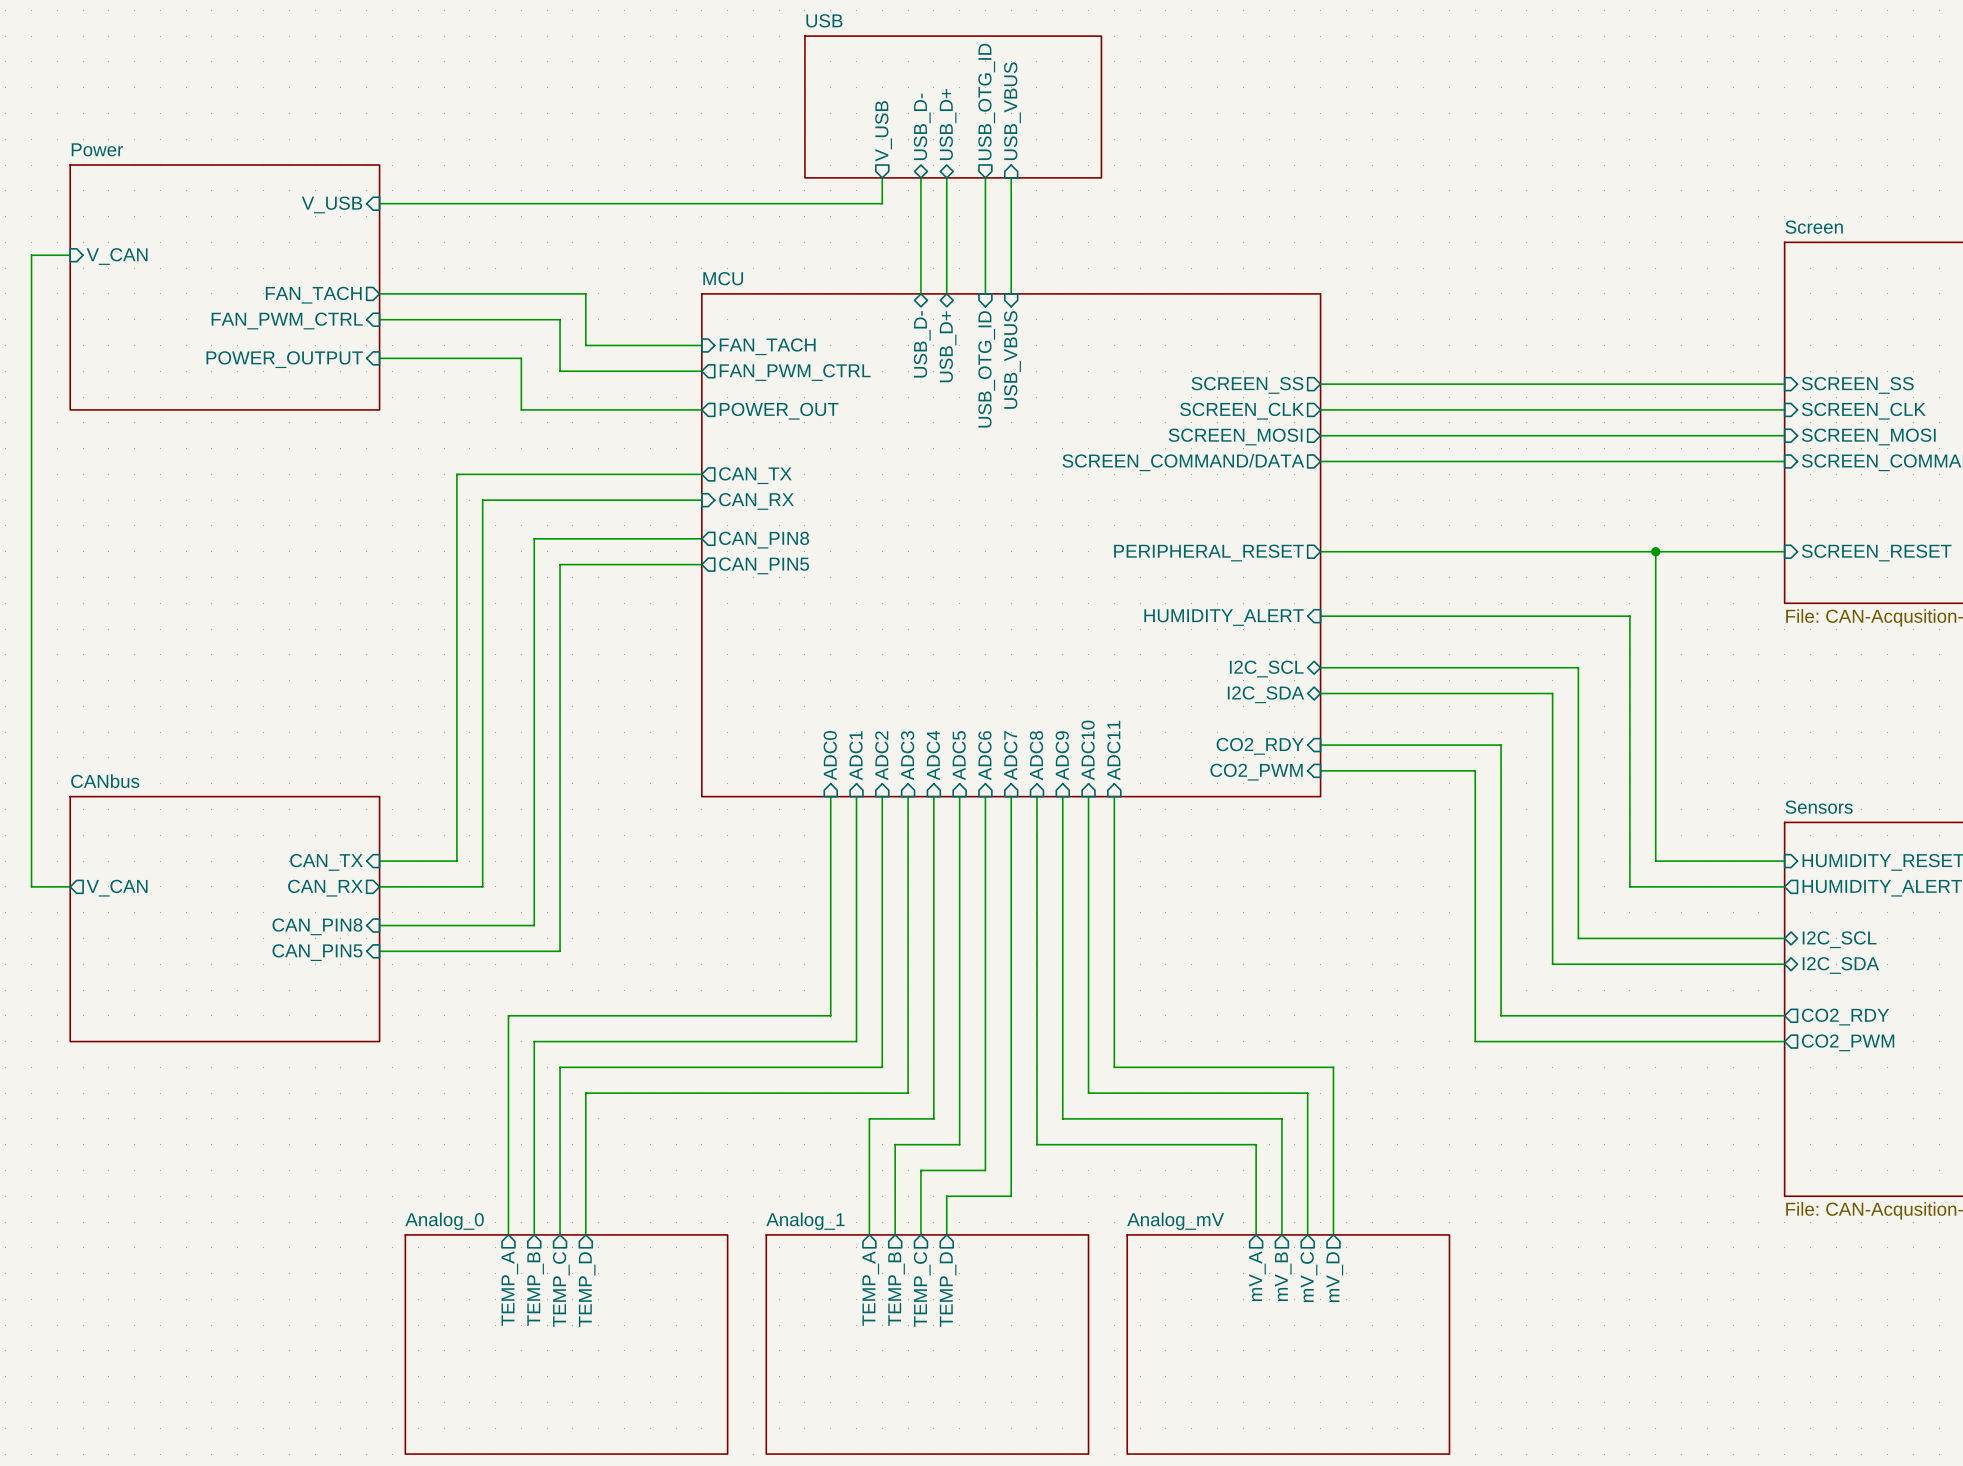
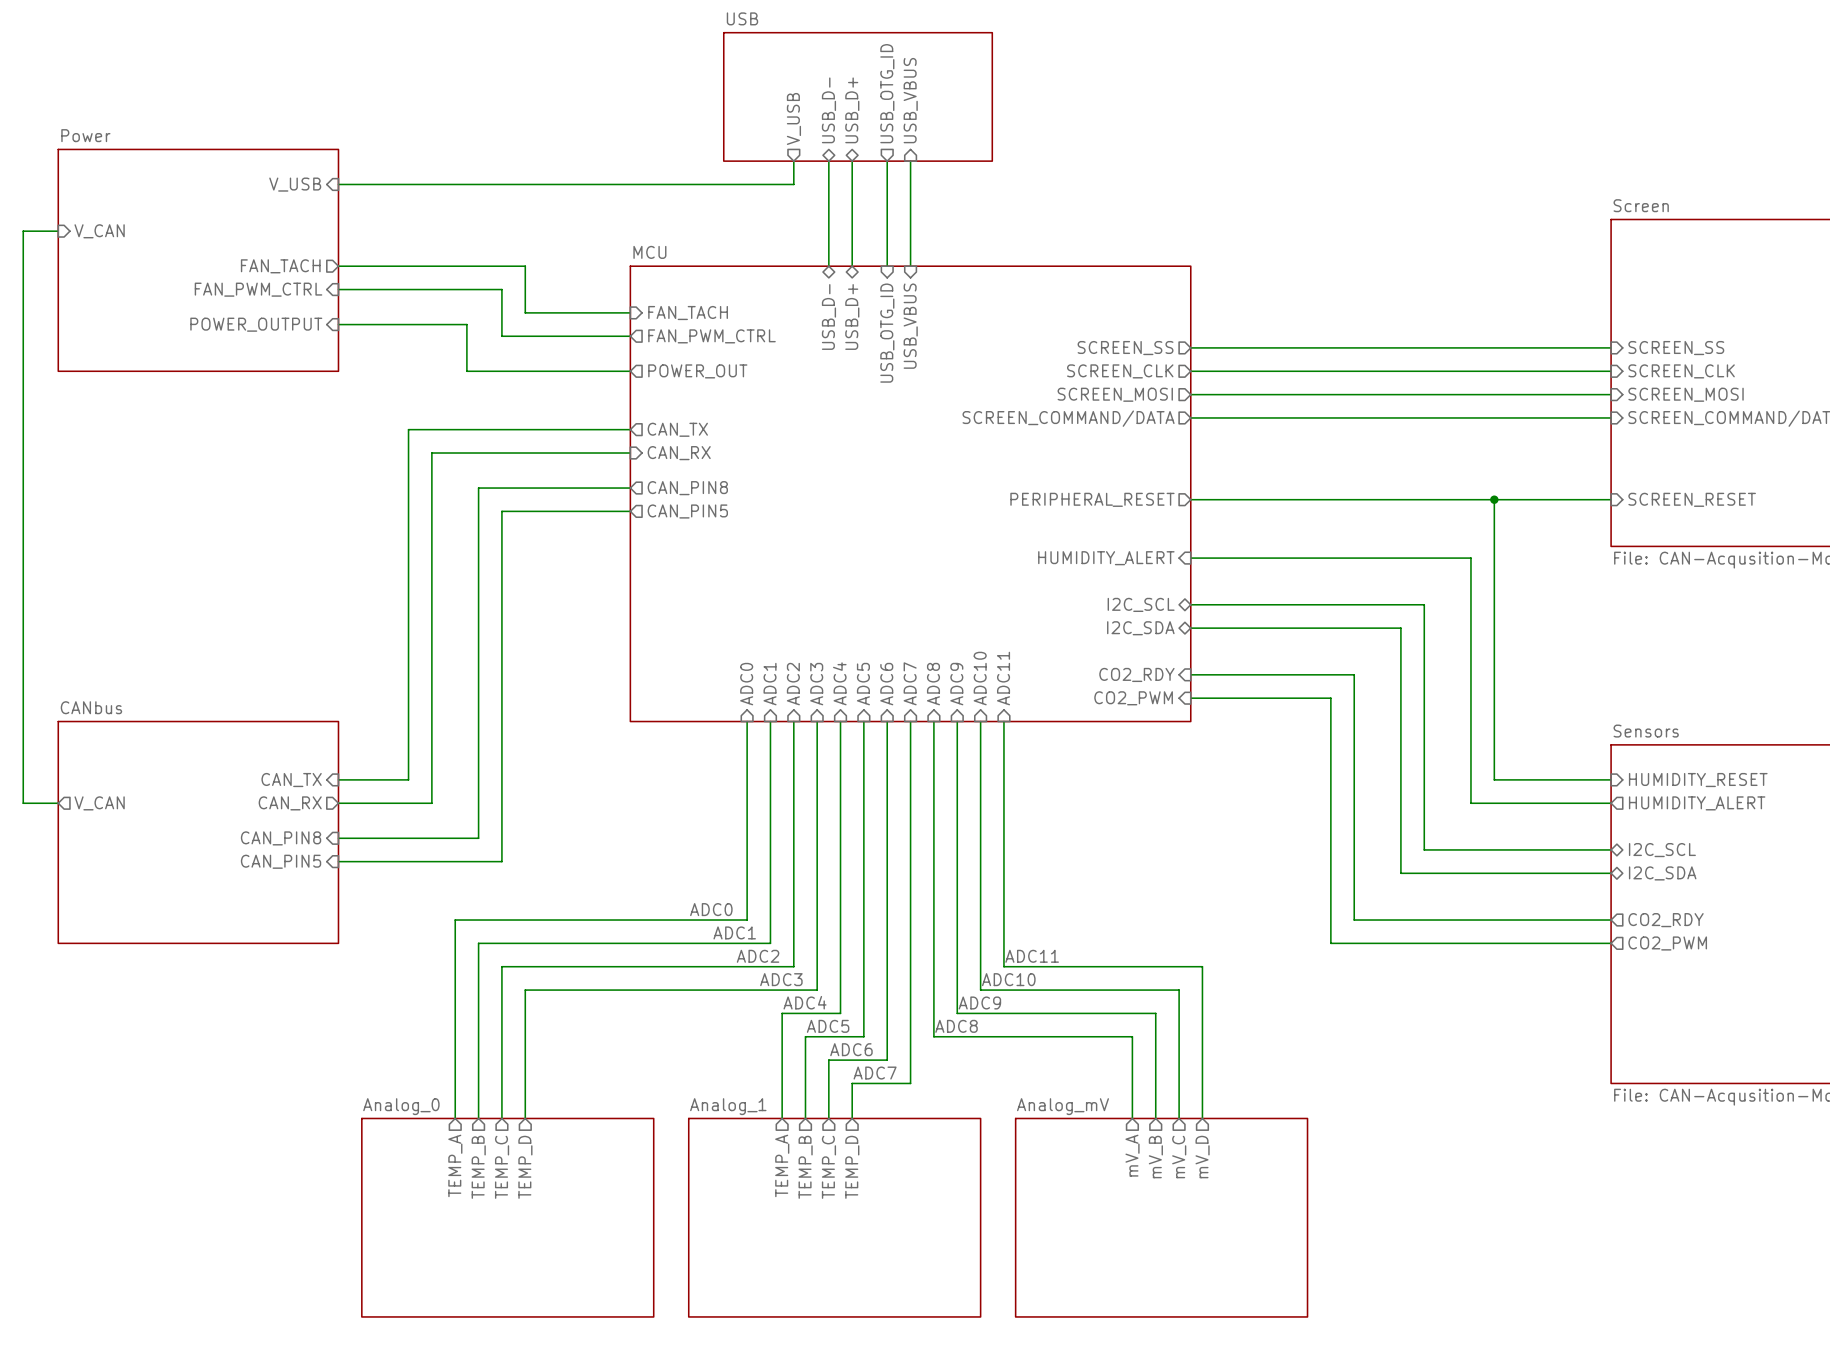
label: none -> ADC0 (711, 909)
label: none -> ADC1 (734, 932)
label: none -> ADC2 (758, 956)
label: none -> ADC11 (1032, 956)
label: none -> ADC3 (781, 979)
label: none -> ADC10 (1008, 979)
label: none -> ADC4 (805, 1002)
label: none -> ADC9 (979, 1002)
label: none -> ADC5 (828, 1026)
label: none -> ADC8 (956, 1026)
label: none -> ADC6 (851, 1049)
label: none -> ADC7 (875, 1073)

